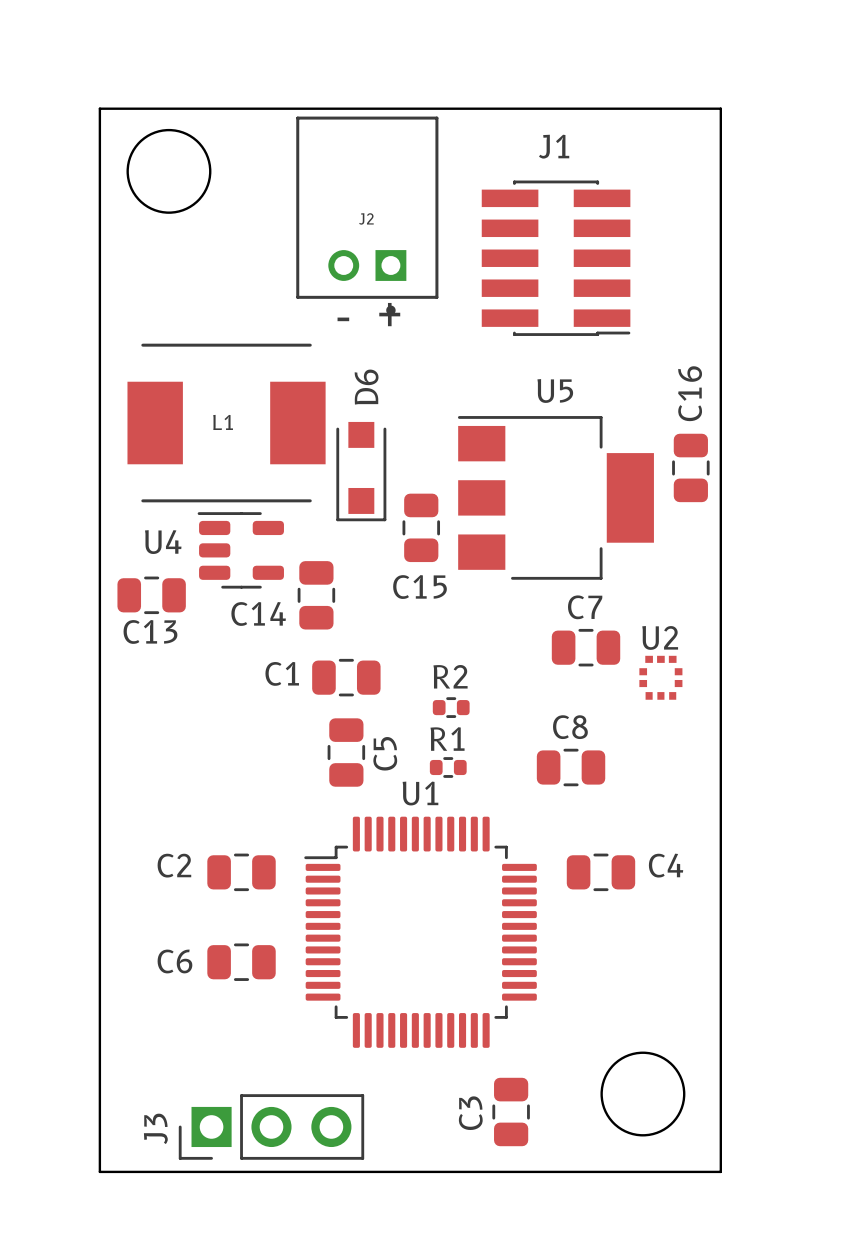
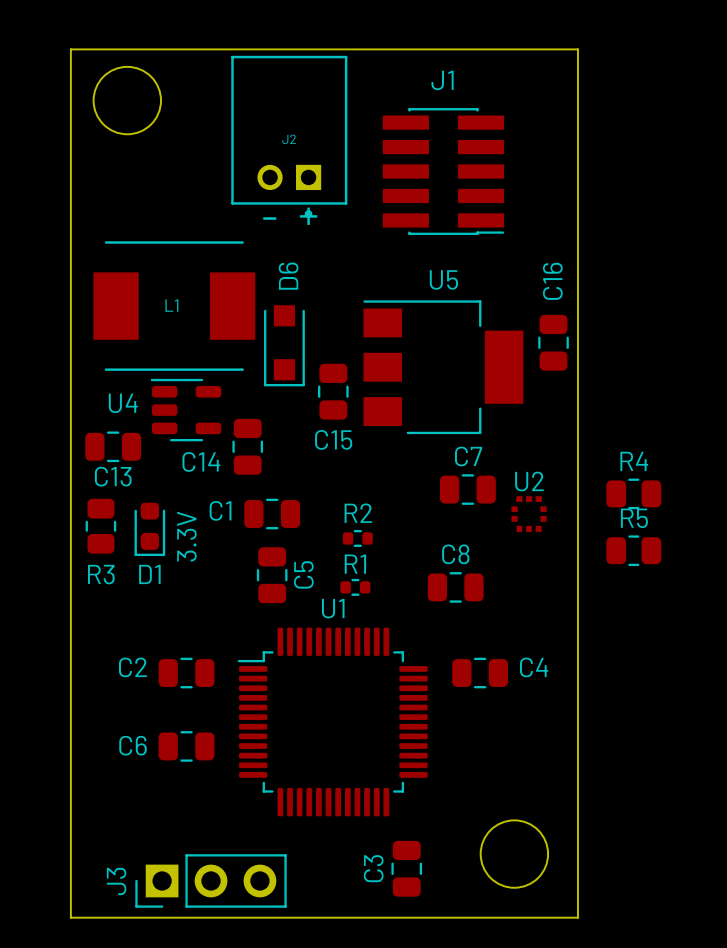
R4: none -> (633, 493)
R3: none -> (100, 526)
D1: none -> (149, 529)
text: none -> 3.3V (186, 536)
R5: none -> (633, 550)

